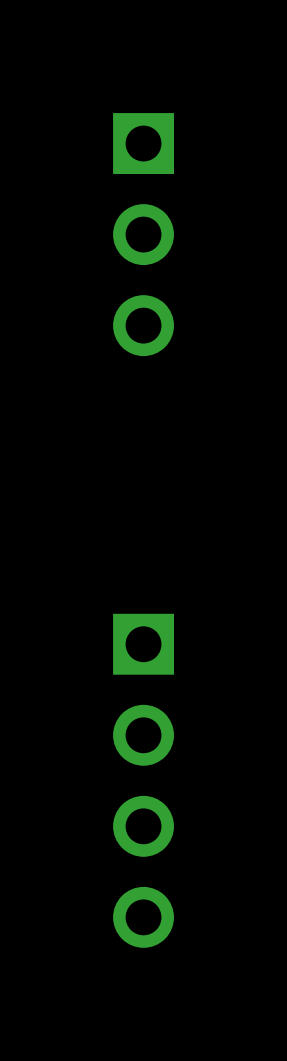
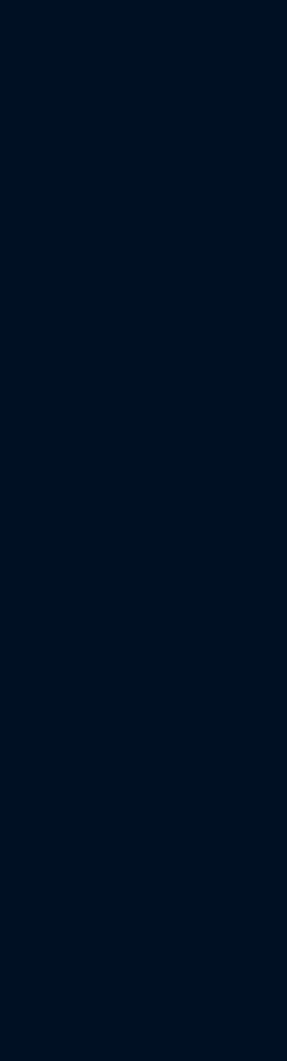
part: (143, 234) -> none
part: (143, 780) -> none

